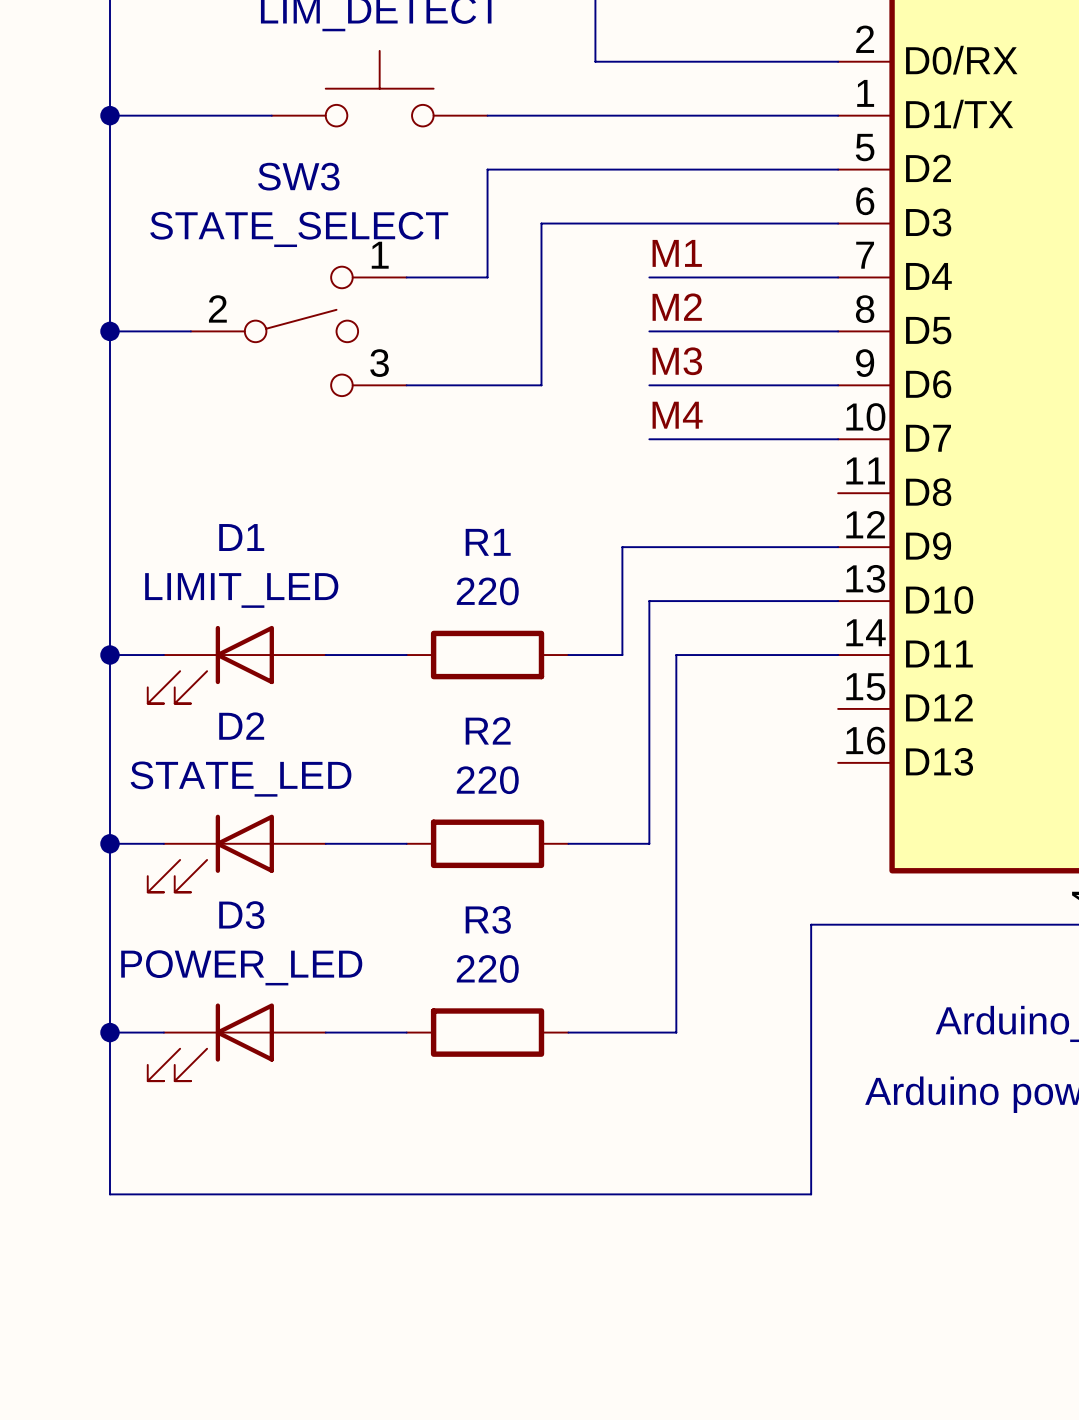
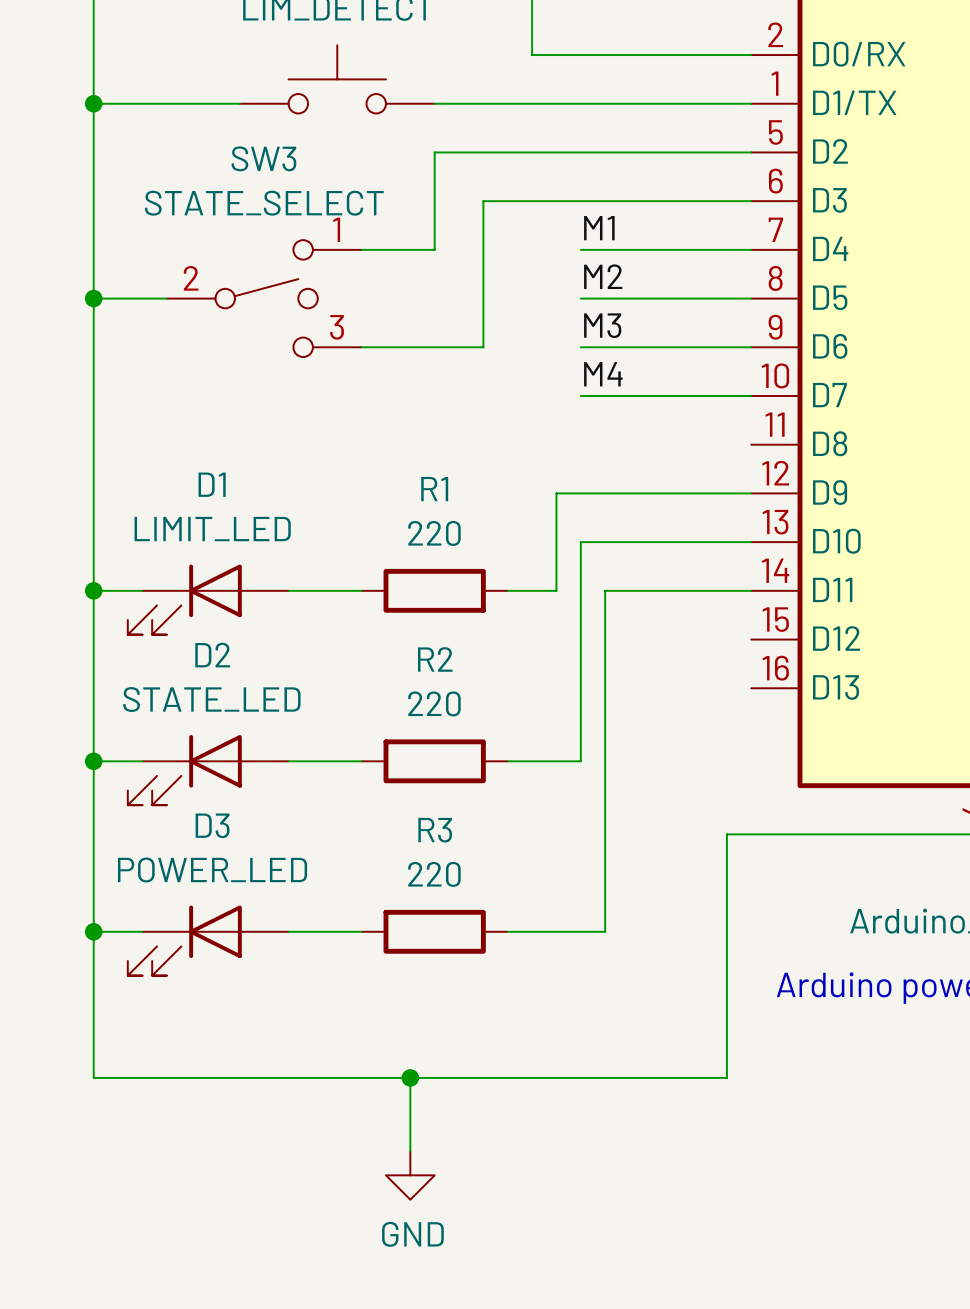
wire: none -> (410, 1077) (410, 1150)
junction: none -> (410, 1077)
power symbol: none -> GND (410, 1175)

